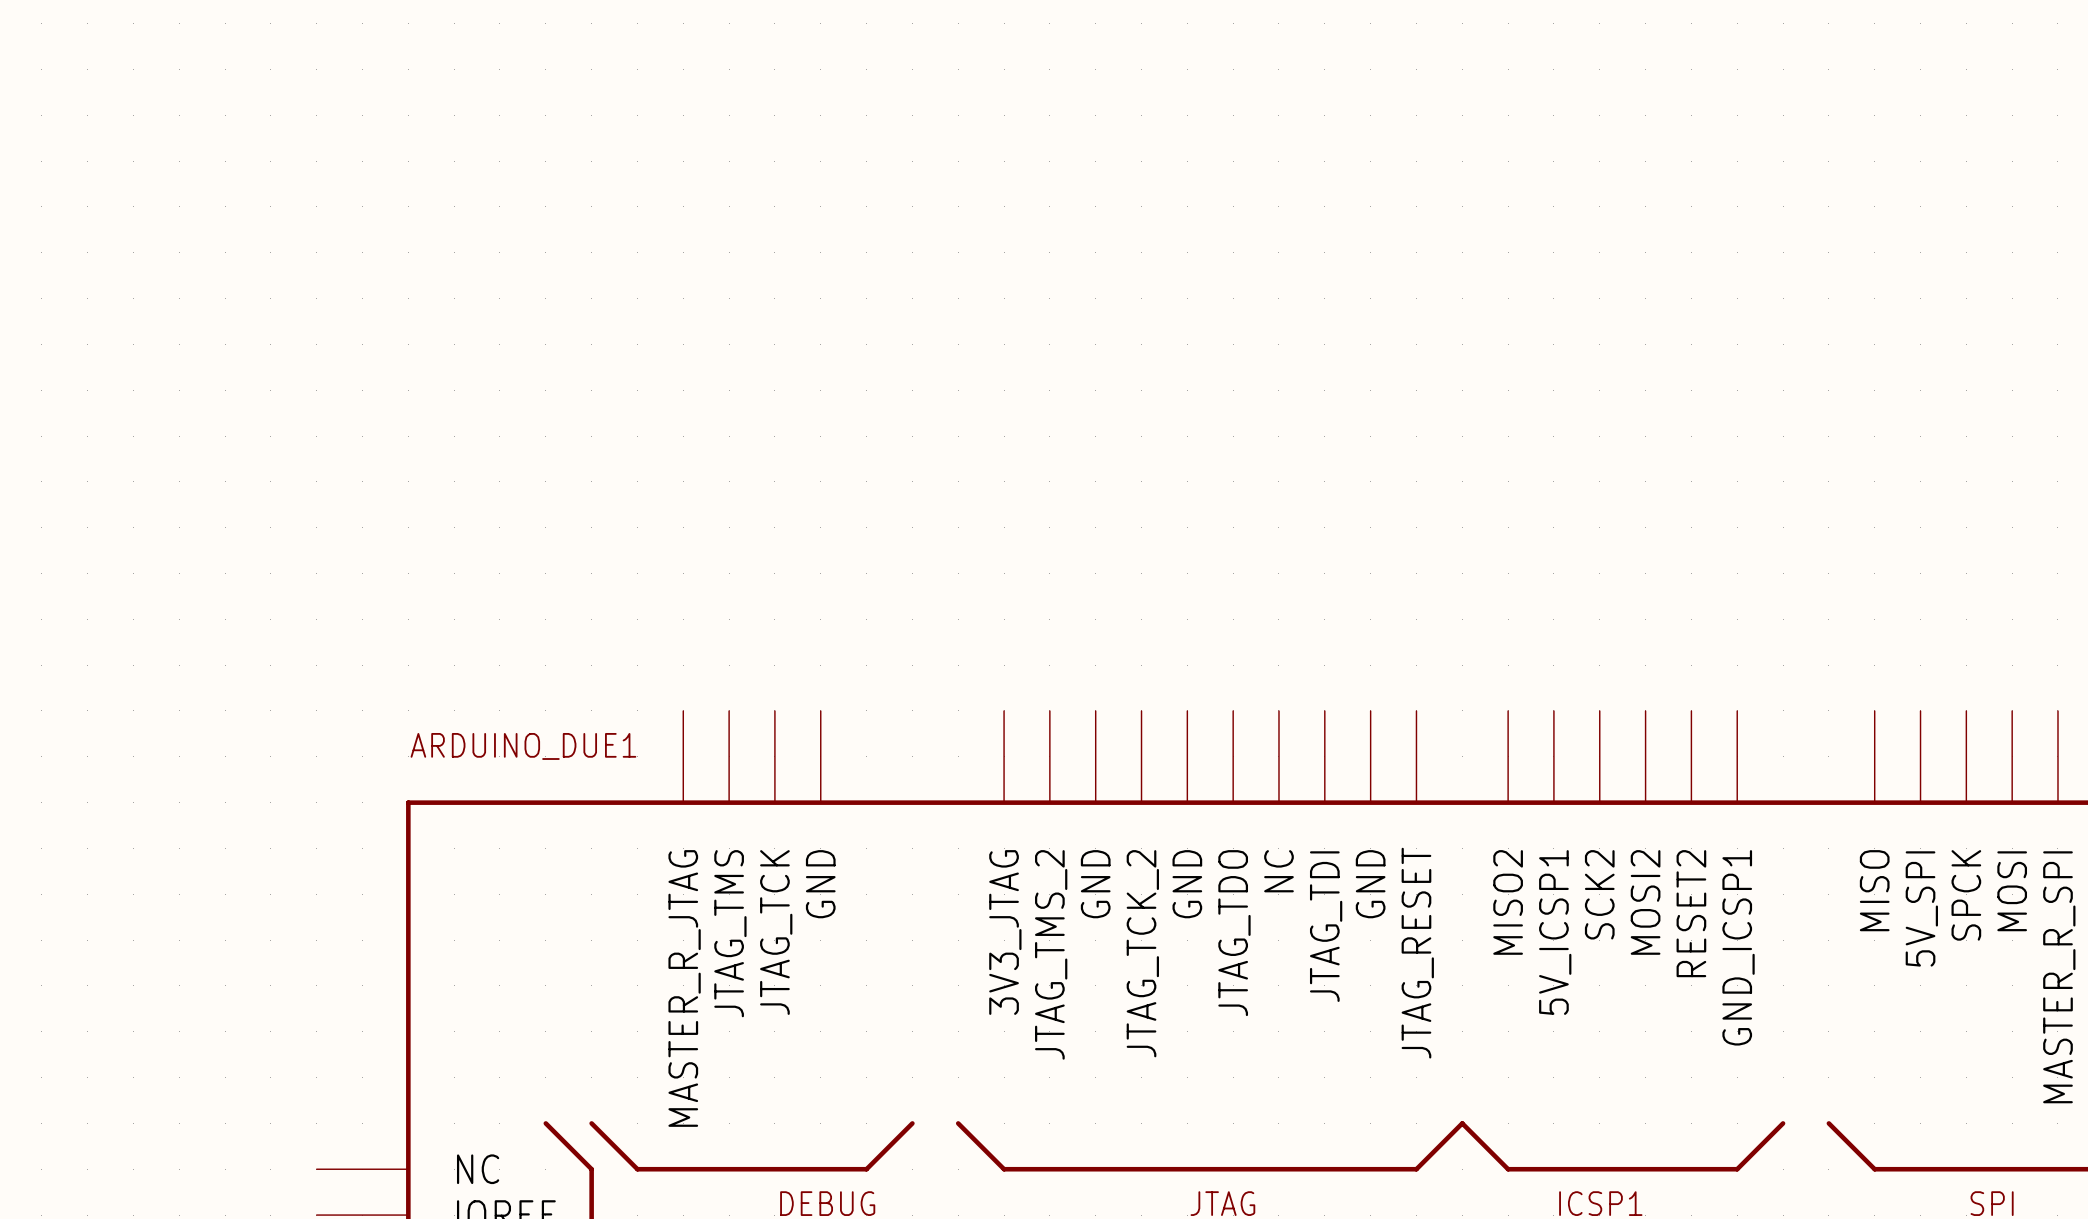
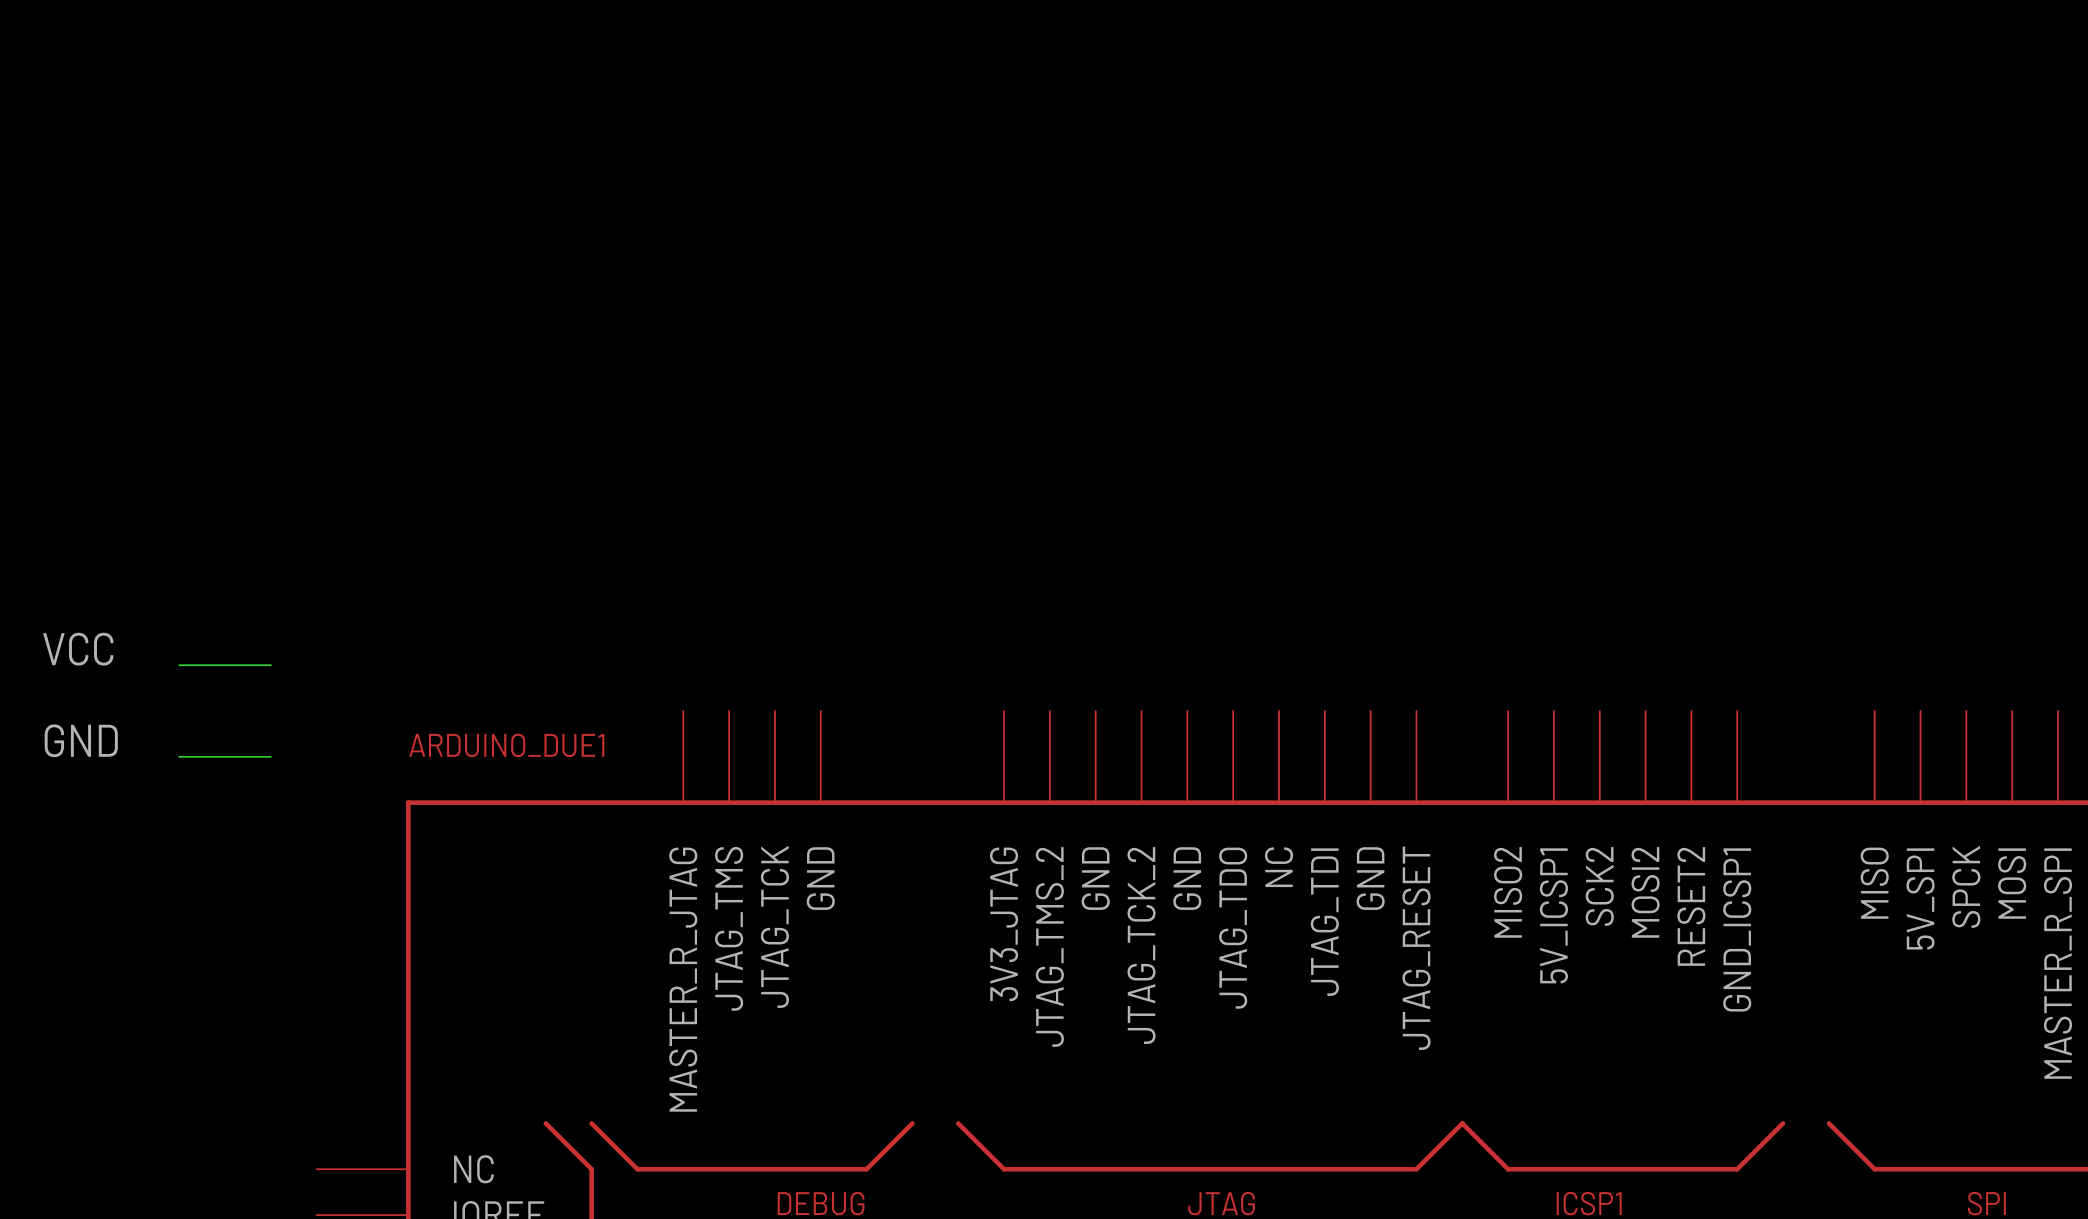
label: none -> VCC (78, 649)
wire: none -> (179, 665) (270, 665)
label: none -> GND (81, 740)
wire: none -> (179, 756) (270, 756)

